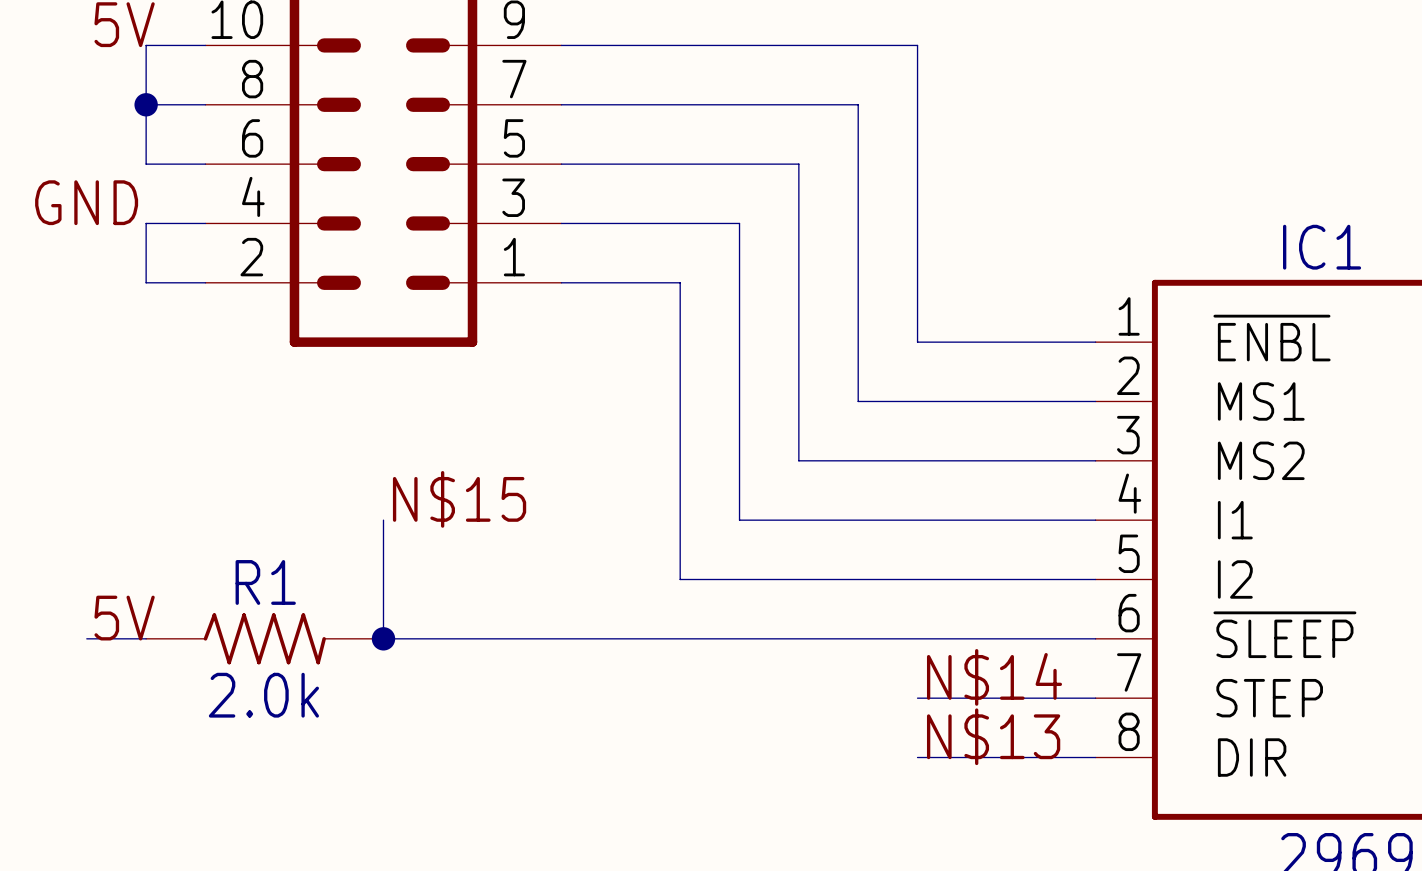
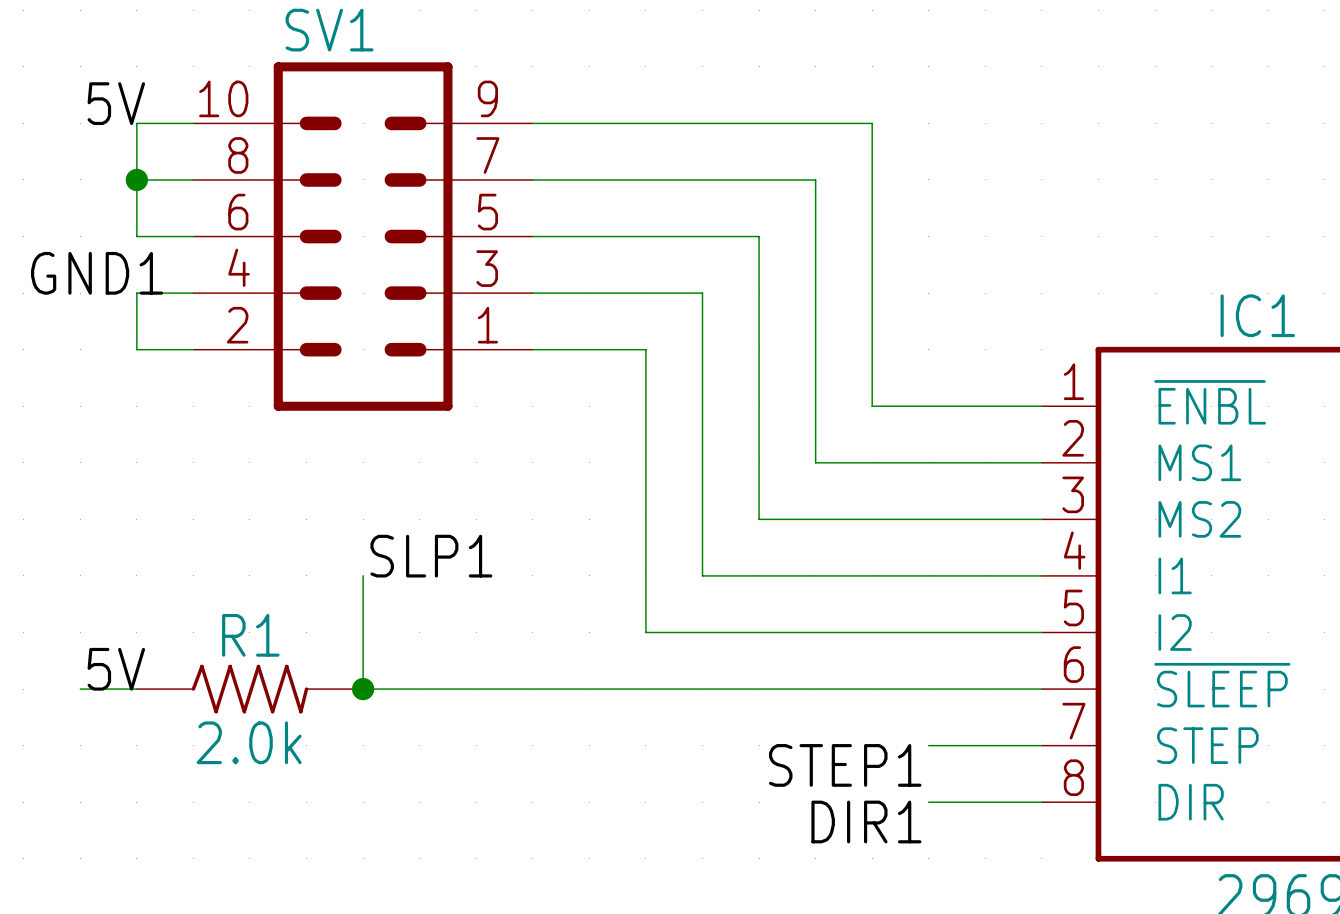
label: GND (86, 202) -> GND1 (97, 273)
label: N$15 (459, 499) -> SLP1 (431, 556)
label: N$14 (994, 677) -> none
wire: (917, 698) (976, 698) -> none
label: none -> STEP1 (845, 765)
label: N$13 (993, 736) -> none
wire: (917, 757) (976, 757) -> none
label: none -> DIR1 (866, 821)

